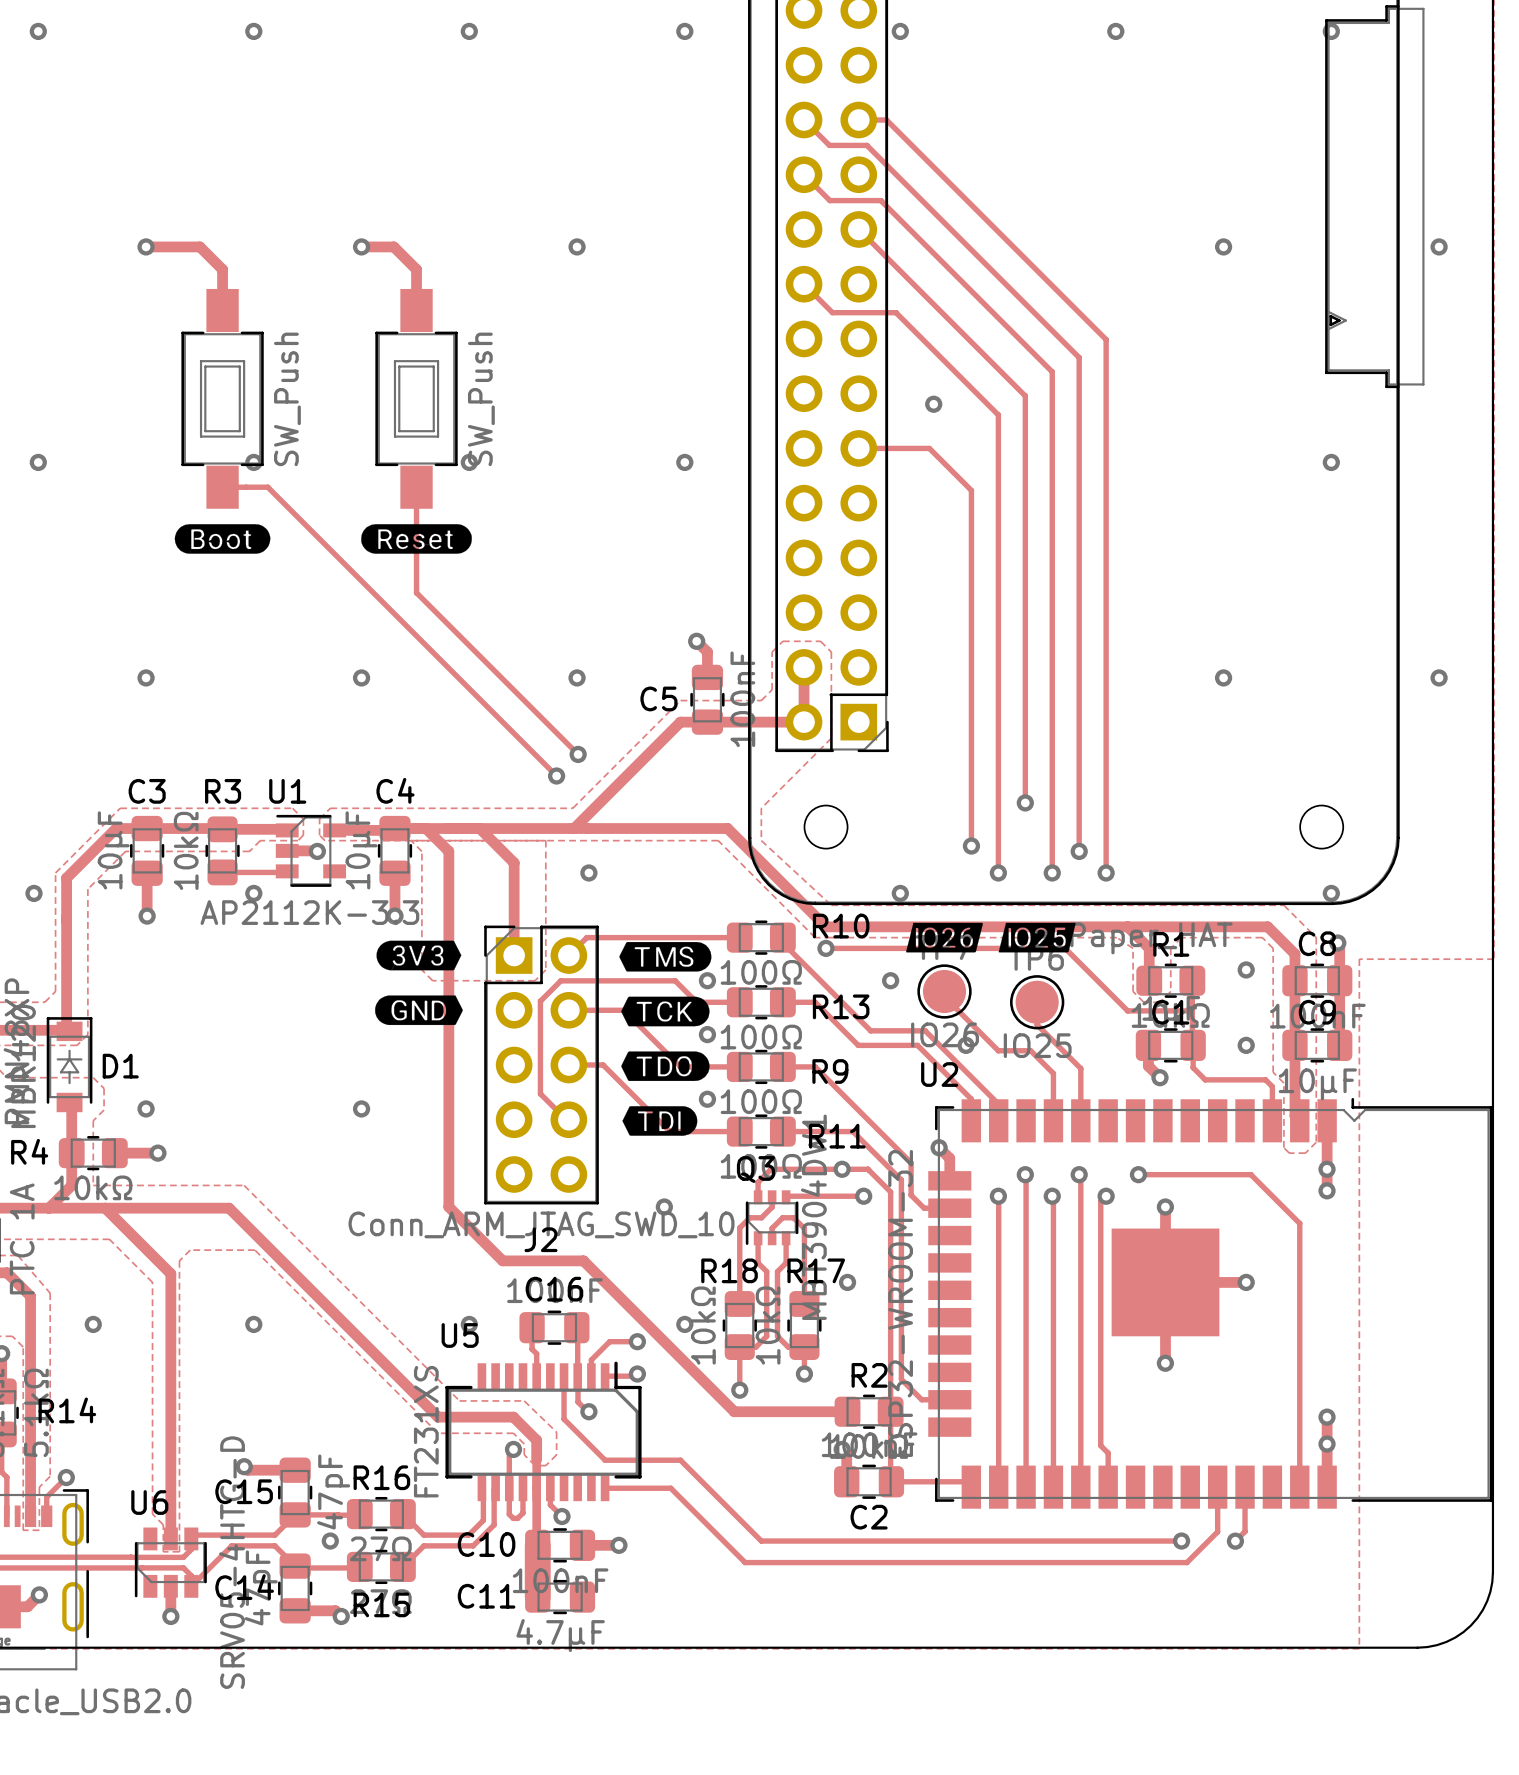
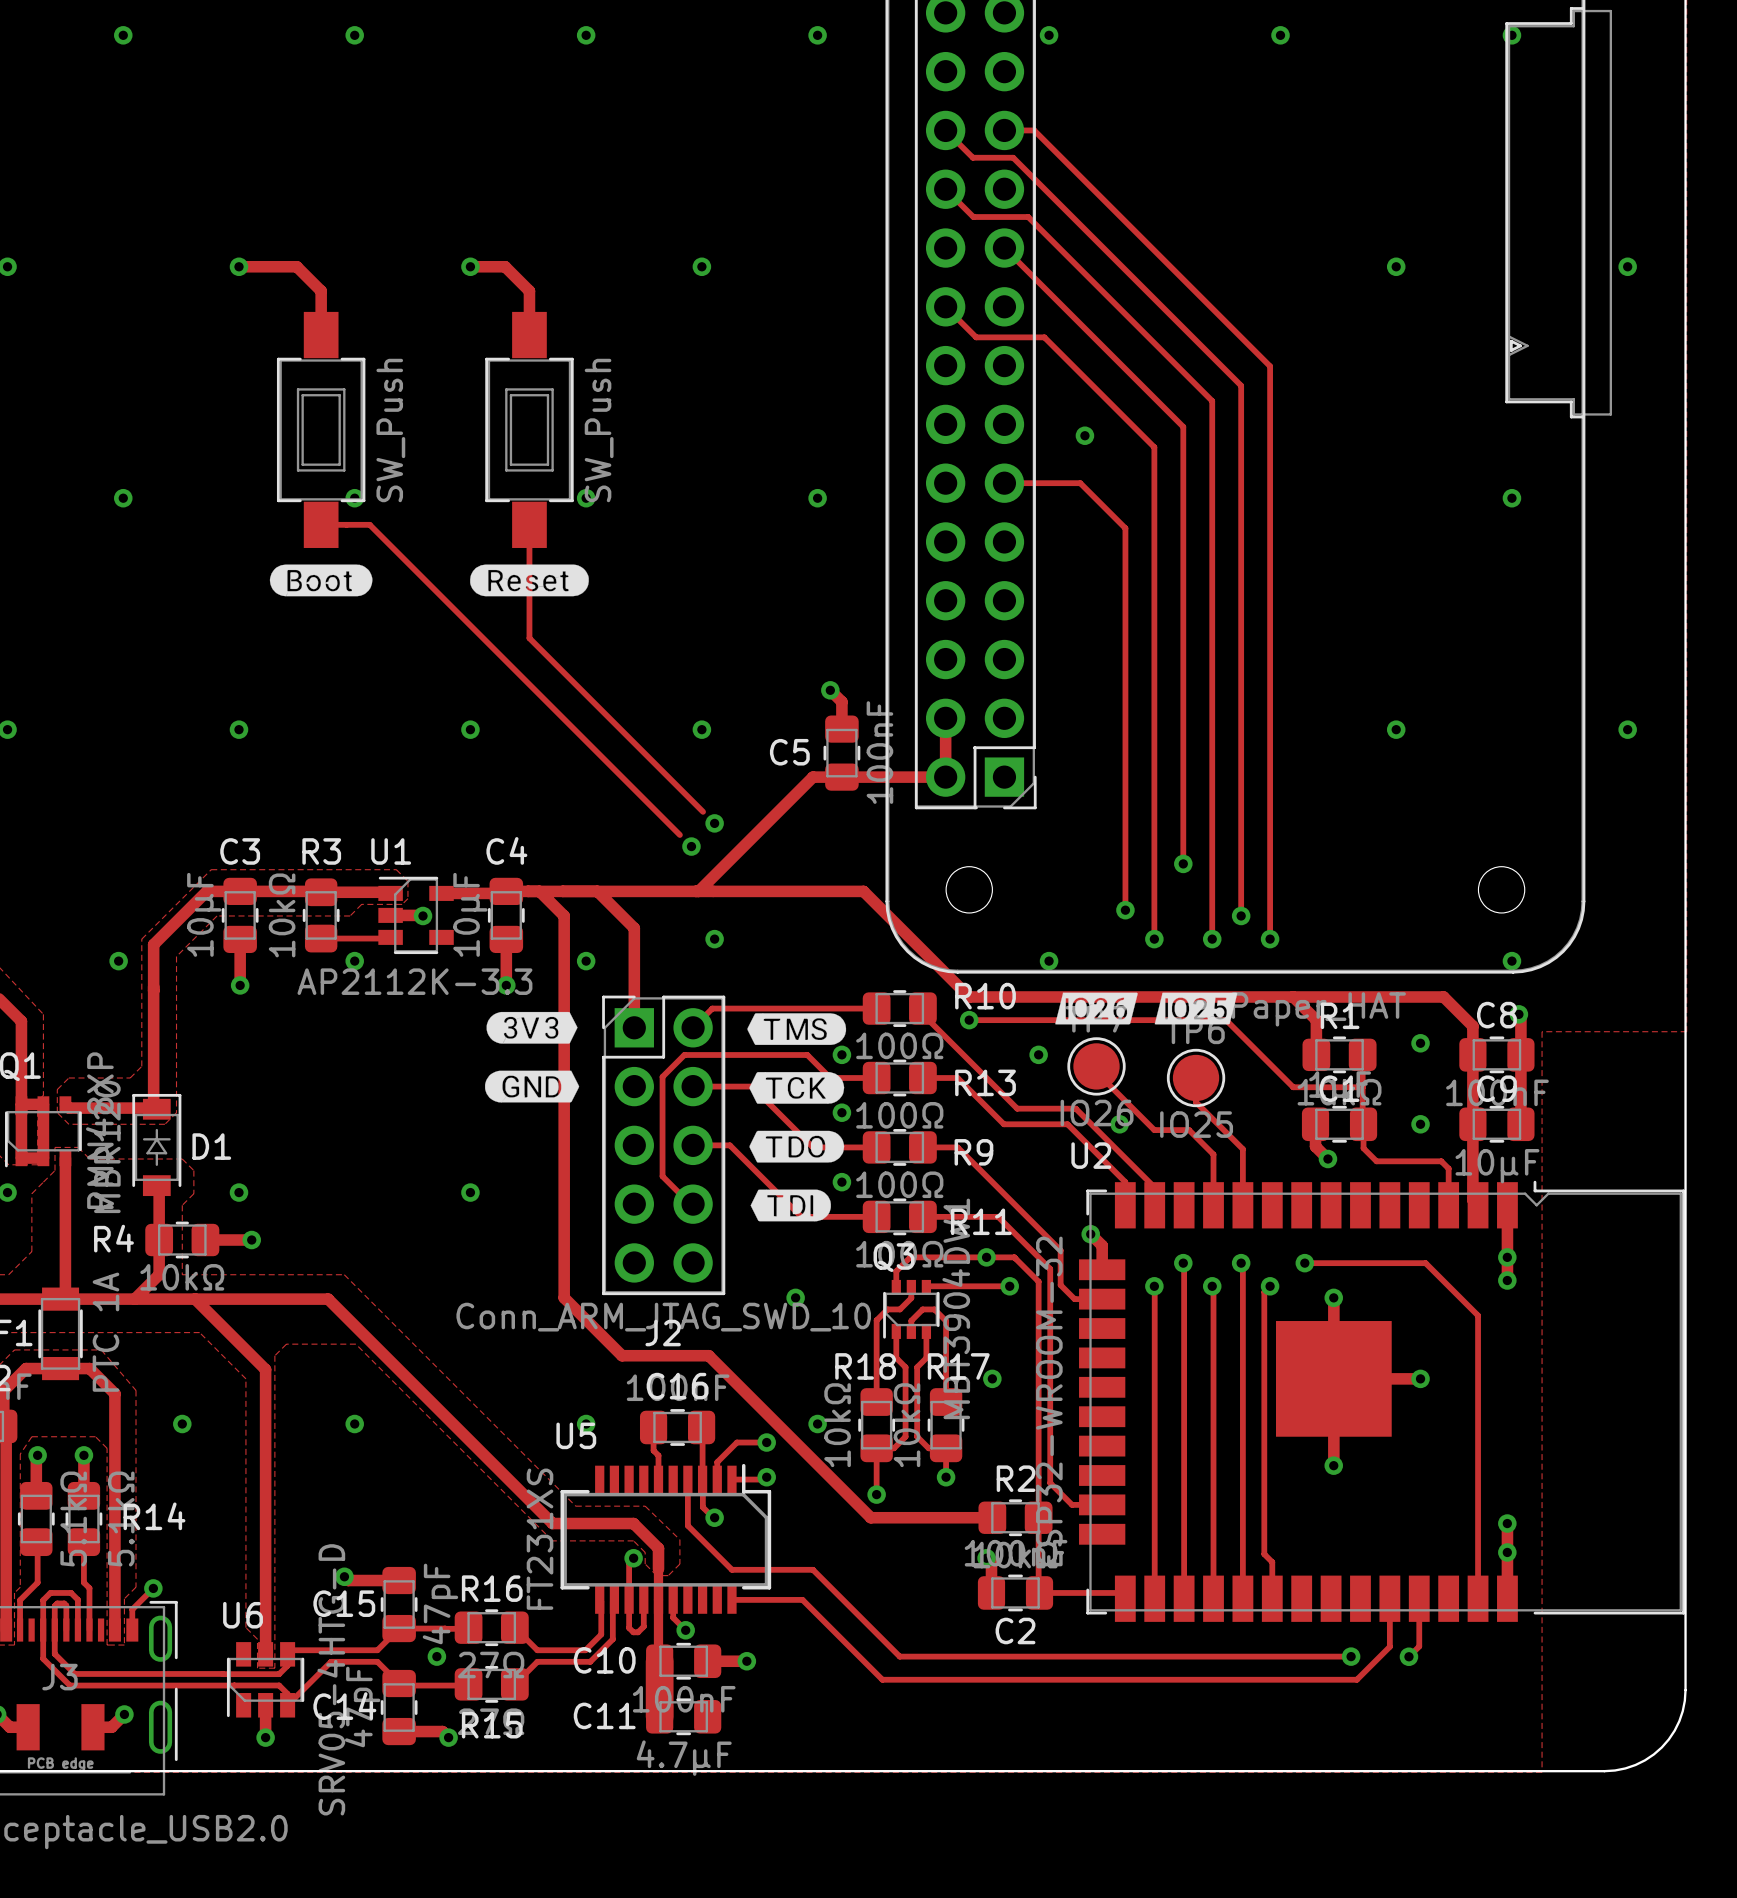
zone outline: (782, 641) (772, 652) (772, 689) (761, 700) (680, 700) (572, 808) (330, 808) (319, 819) (319, 835) (324, 840) (718, 840) (815, 937) (1116, 937) (1133, 948) (1133, 991) (1143, 1002) (1160, 1002) (1170, 991) (1170, 948) (1181, 937) (1262, 937) (1273, 948) (1273, 1072) (1283, 1083) (1283, 1147) (1289, 1153) (1305, 1153) (1316, 1142) (1316, 937) (1283, 905) (831, 905) (761, 840) (761, 808) (831, 738) (831, 652) (820, 641) (782, 641) -> none
via position: (578, 754) -> (714, 823)
via position: (556, 776) -> (691, 846)
zone outline: (411, 840) (421, 851) (421, 969) (432, 980) (535, 980) (545, 969) (545, 840) -> none
via: none -> (586, 961)

